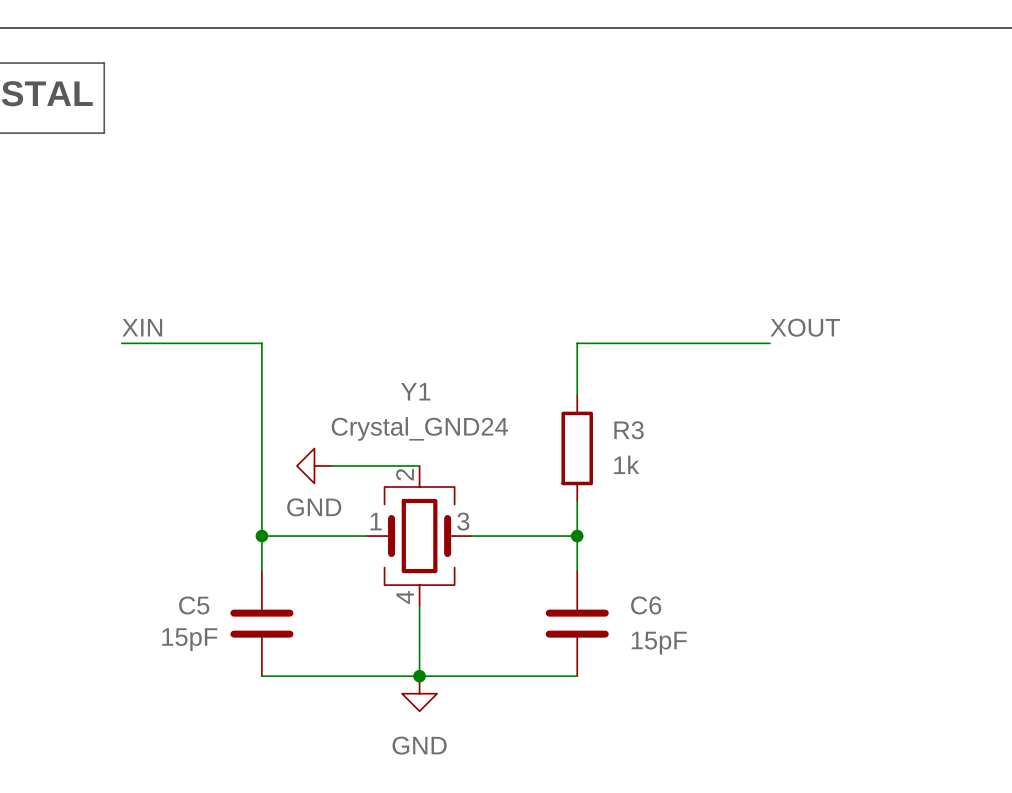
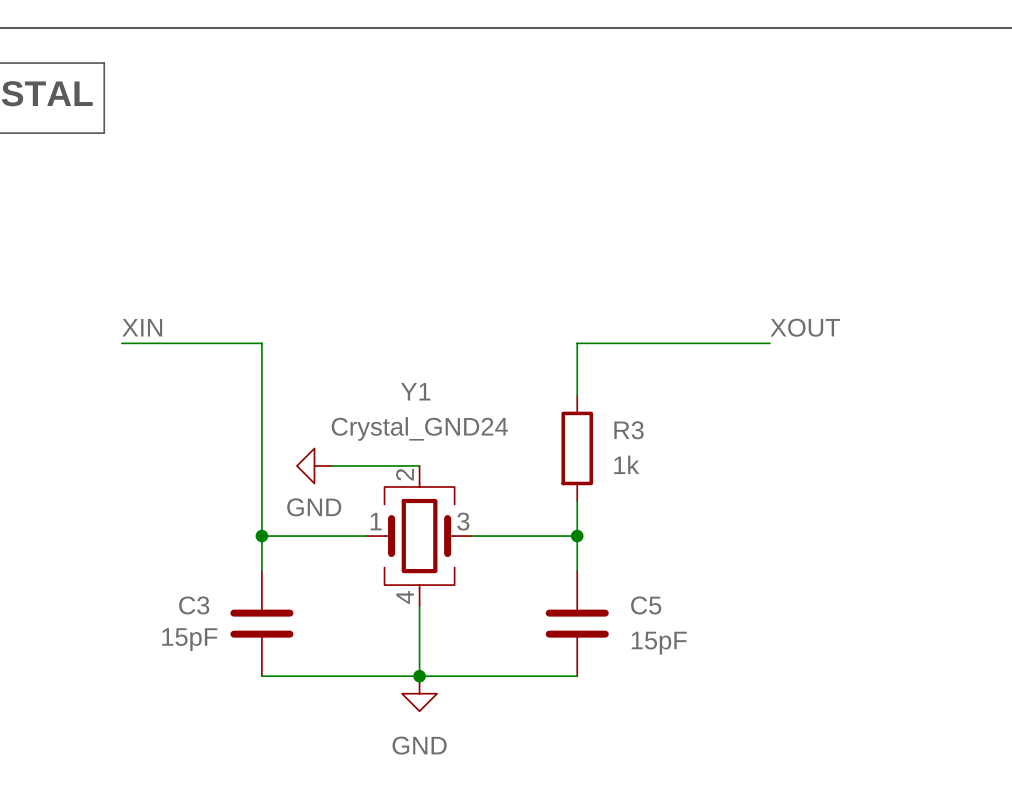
C5 name: C5 (194, 605) -> C3 (194, 605)
C6 name: C6 (646, 605) -> C5 (646, 605)

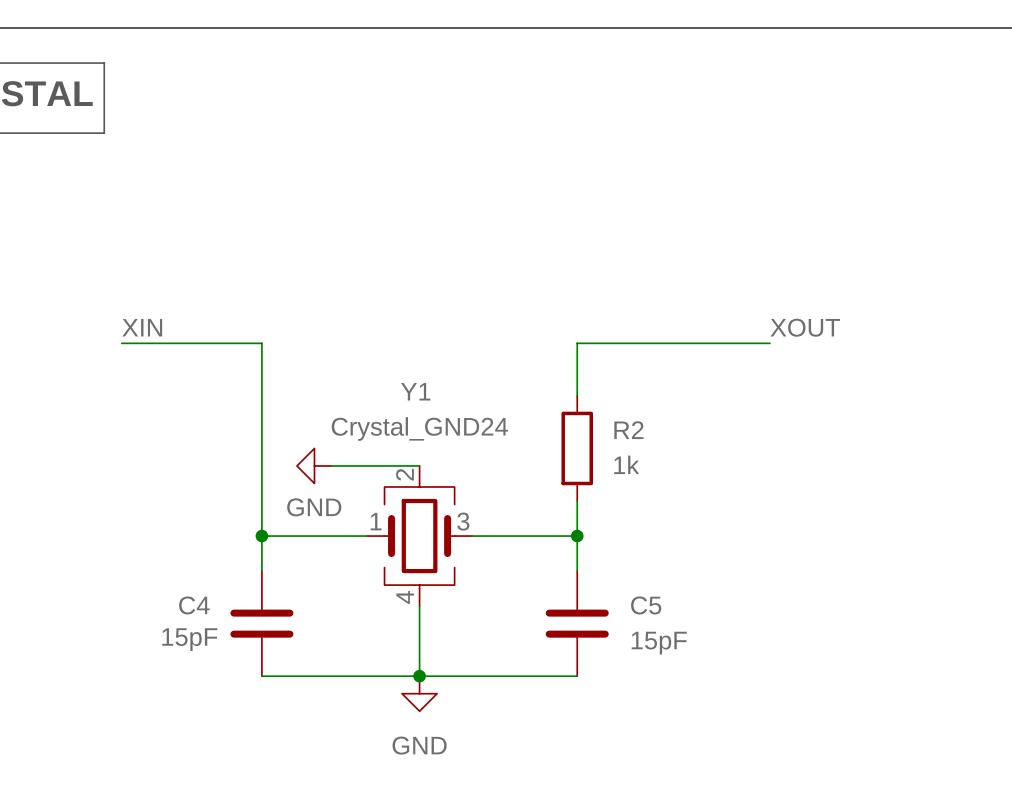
R3 name: R3 (629, 430) -> R2 (628, 430)
C3 name: C3 (194, 605) -> C4 (194, 605)

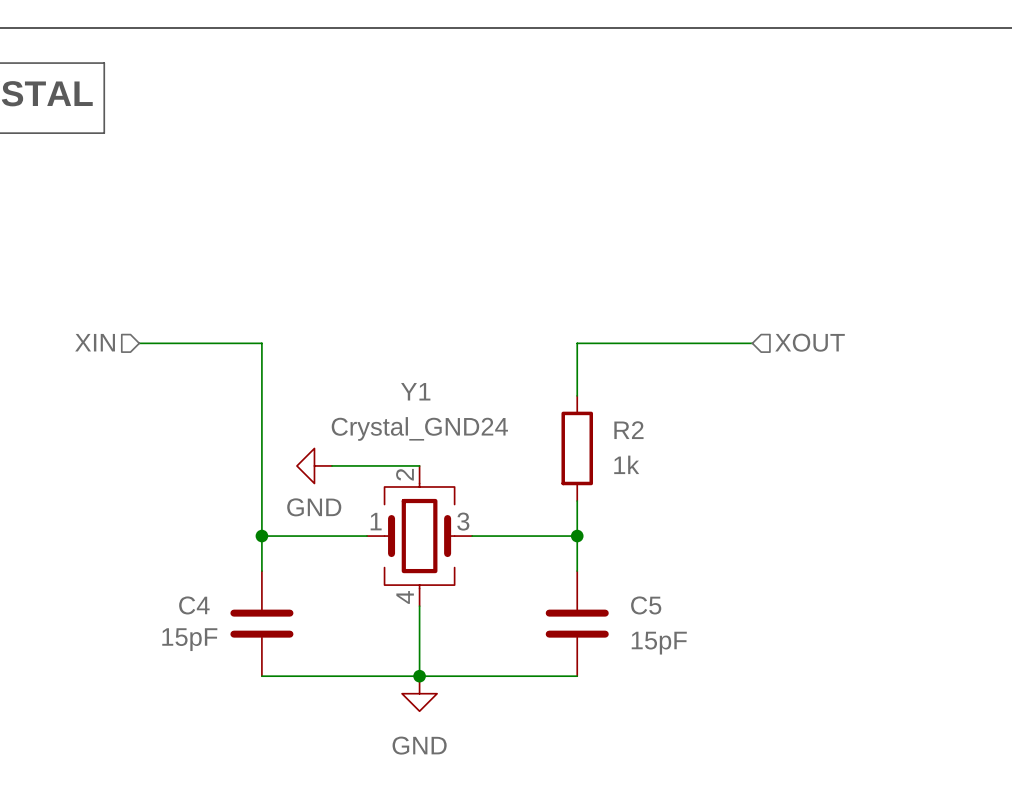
label: XIN (142, 327) -> none
label: XOUT (805, 327) -> none
hierarchical label: none -> XIN (95, 342)
hierarchical label: none -> XOUT (810, 342)
wire: (121, 343) (139, 343) -> none
wire: (752, 343) (769, 343) -> none

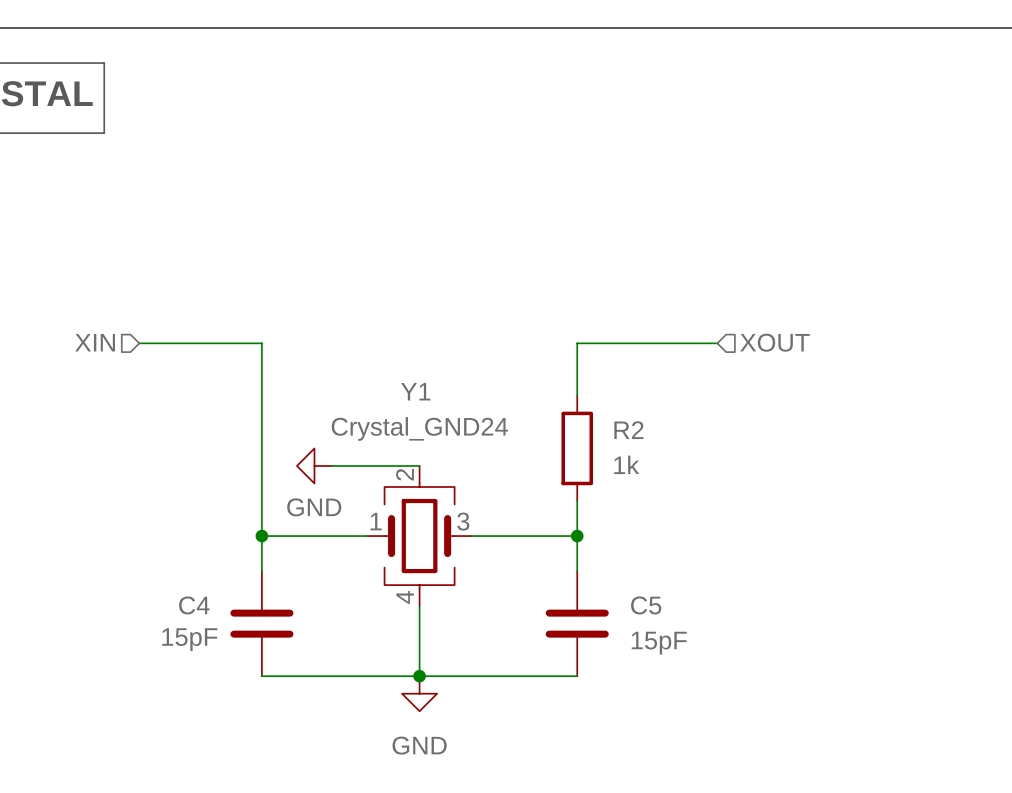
hierarchical label position: XOUT (810, 342) -> XOUT (774, 342)
wire: (717, 343) (752, 343) -> none

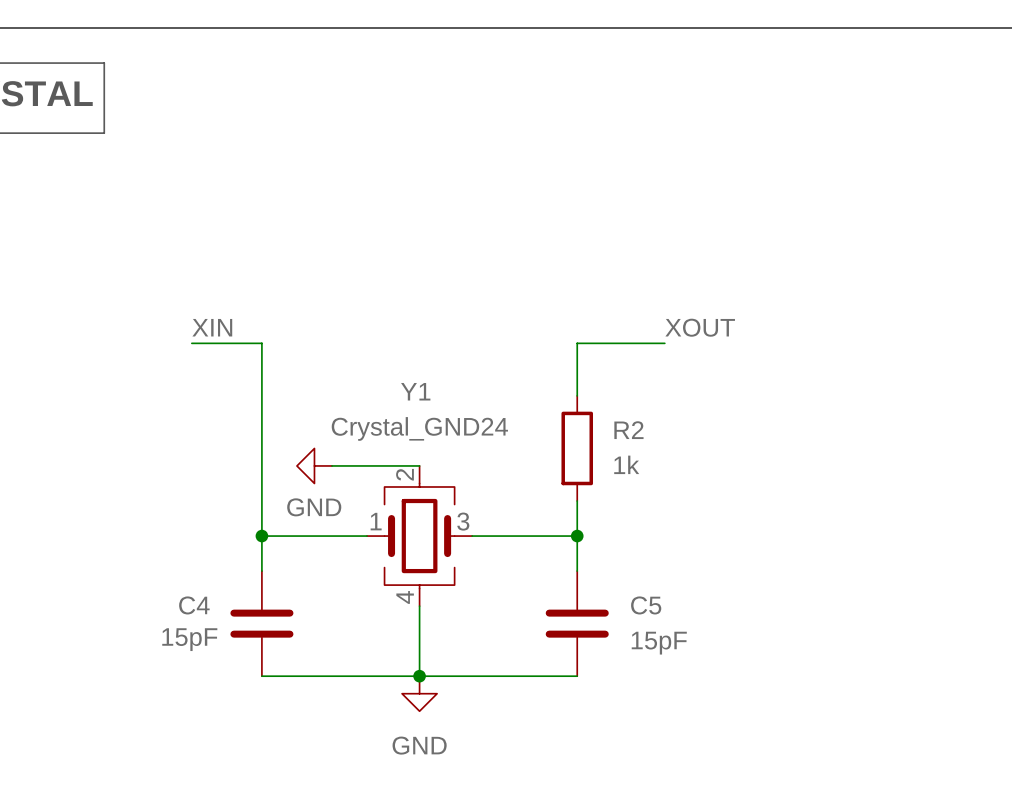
label: none -> XIN (212, 327)
label: none -> XOUT (700, 327)
hierarchical label: XIN (95, 342) -> none
hierarchical label: XOUT (774, 342) -> none
wire: (139, 343) (191, 343) -> none
wire: (664, 343) (717, 343) -> none

